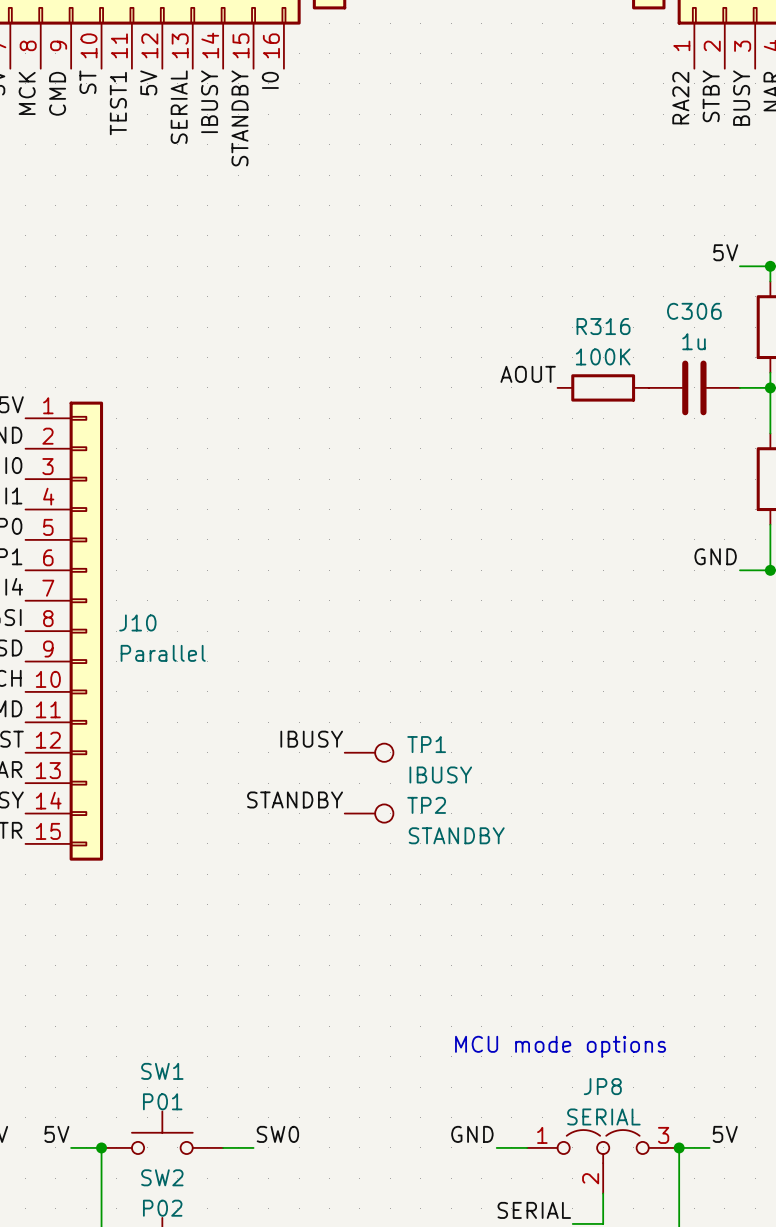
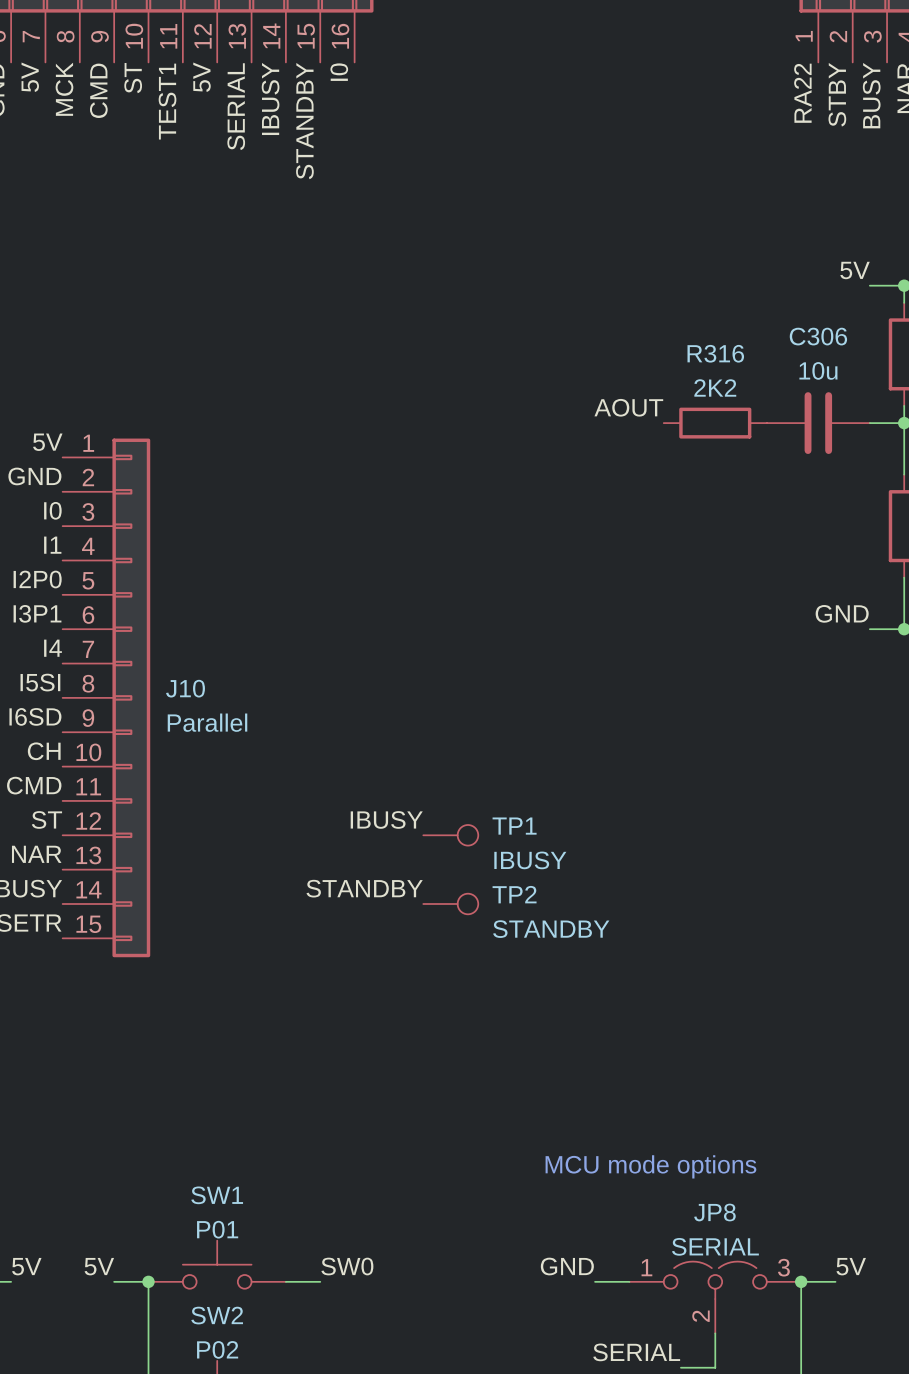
C306 value: 1u (694, 341) -> 10u (818, 370)
R316 value: 100K (603, 356) -> 2K2 (715, 387)

